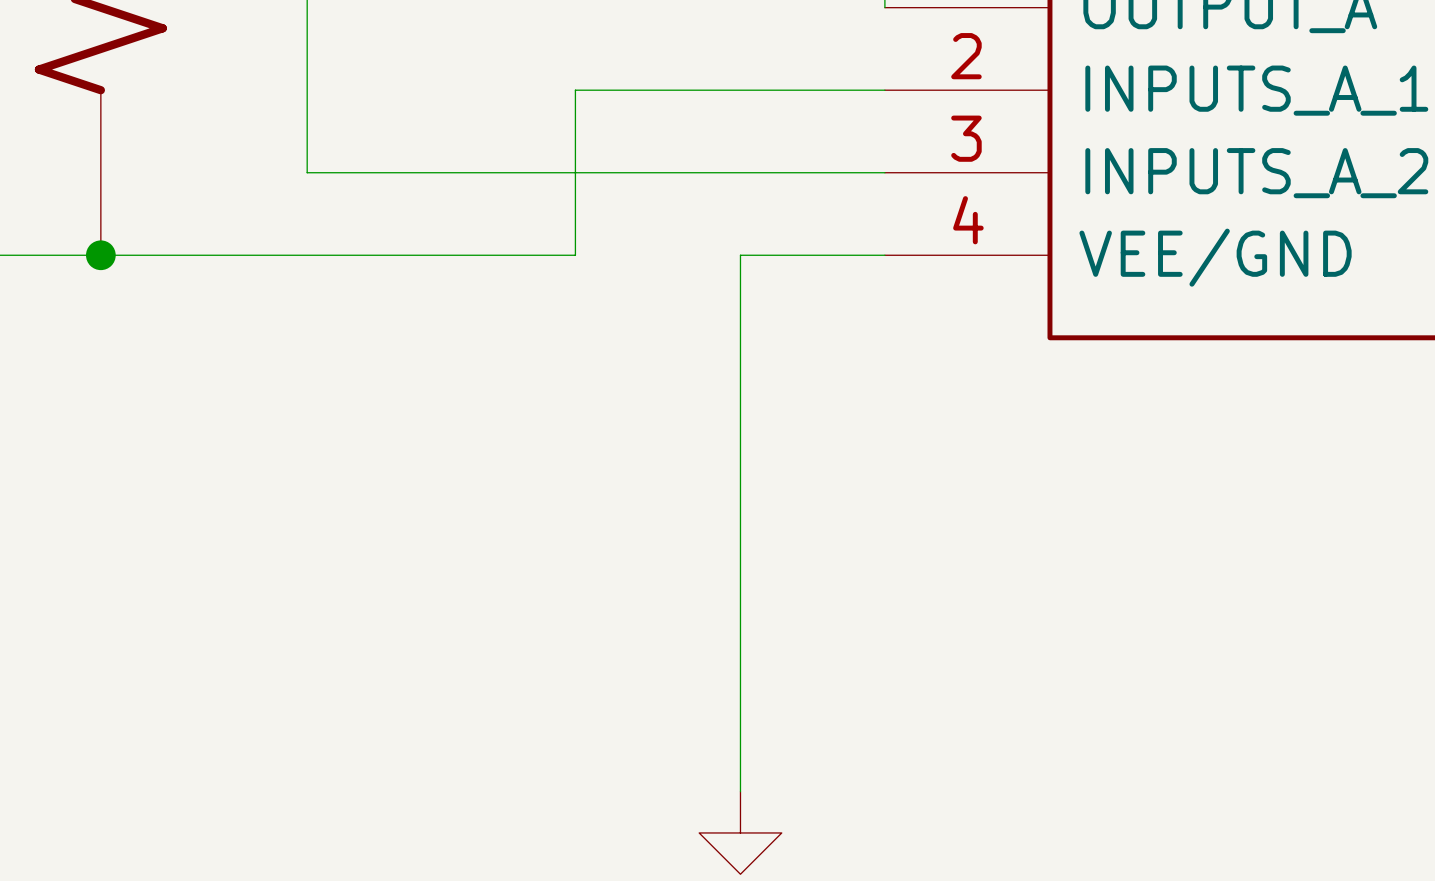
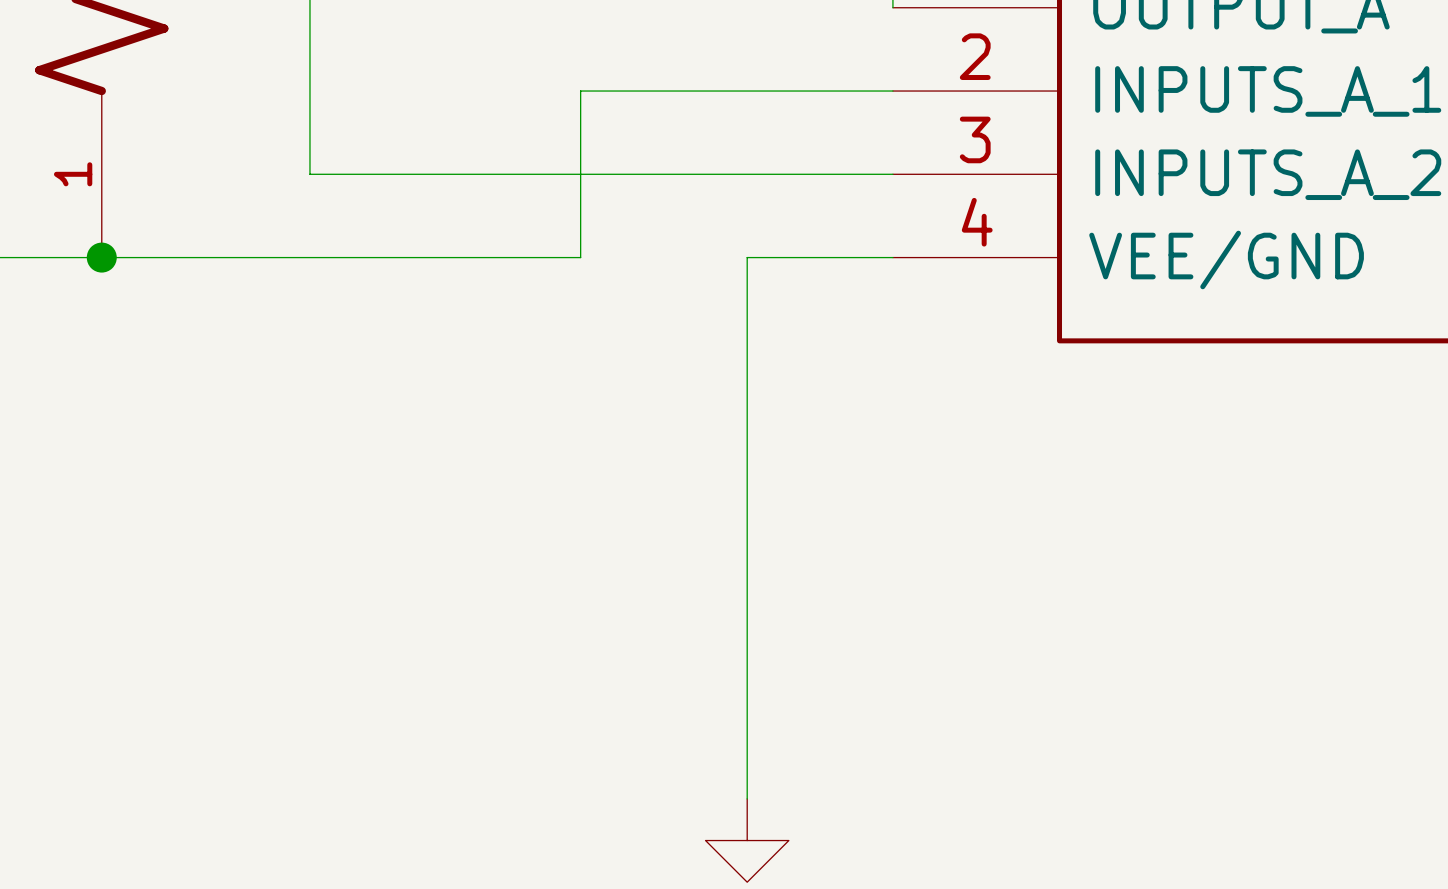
part pin number: none -> 1 (73, 174)

